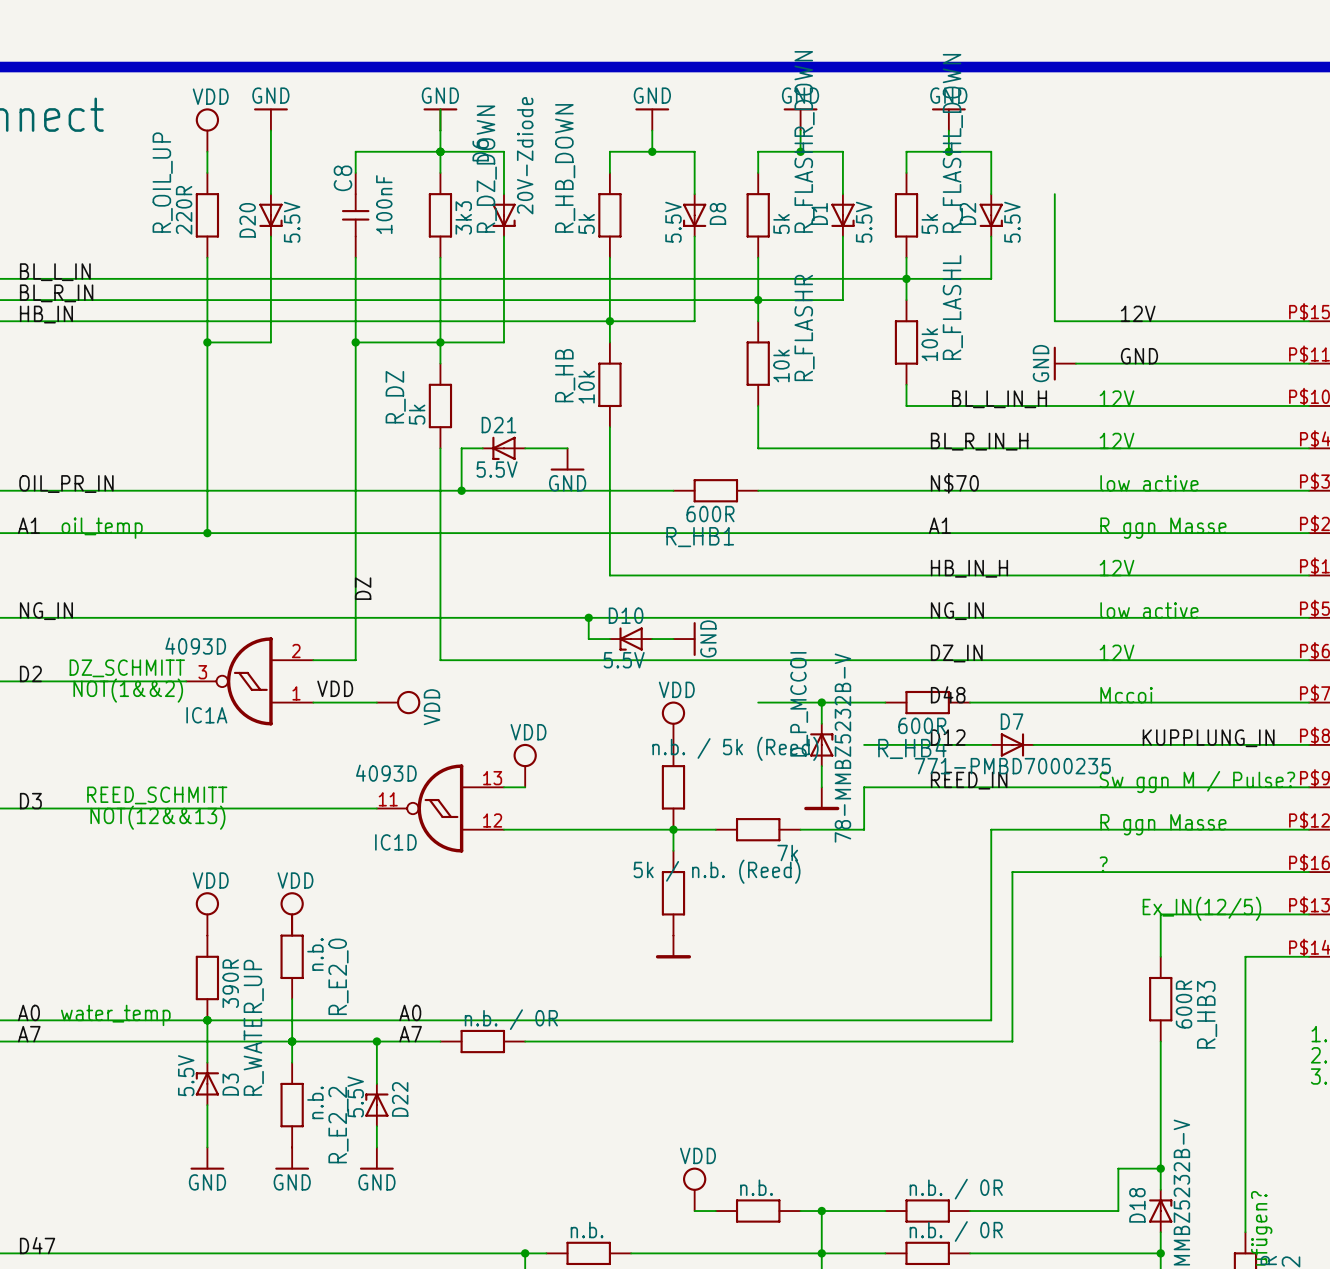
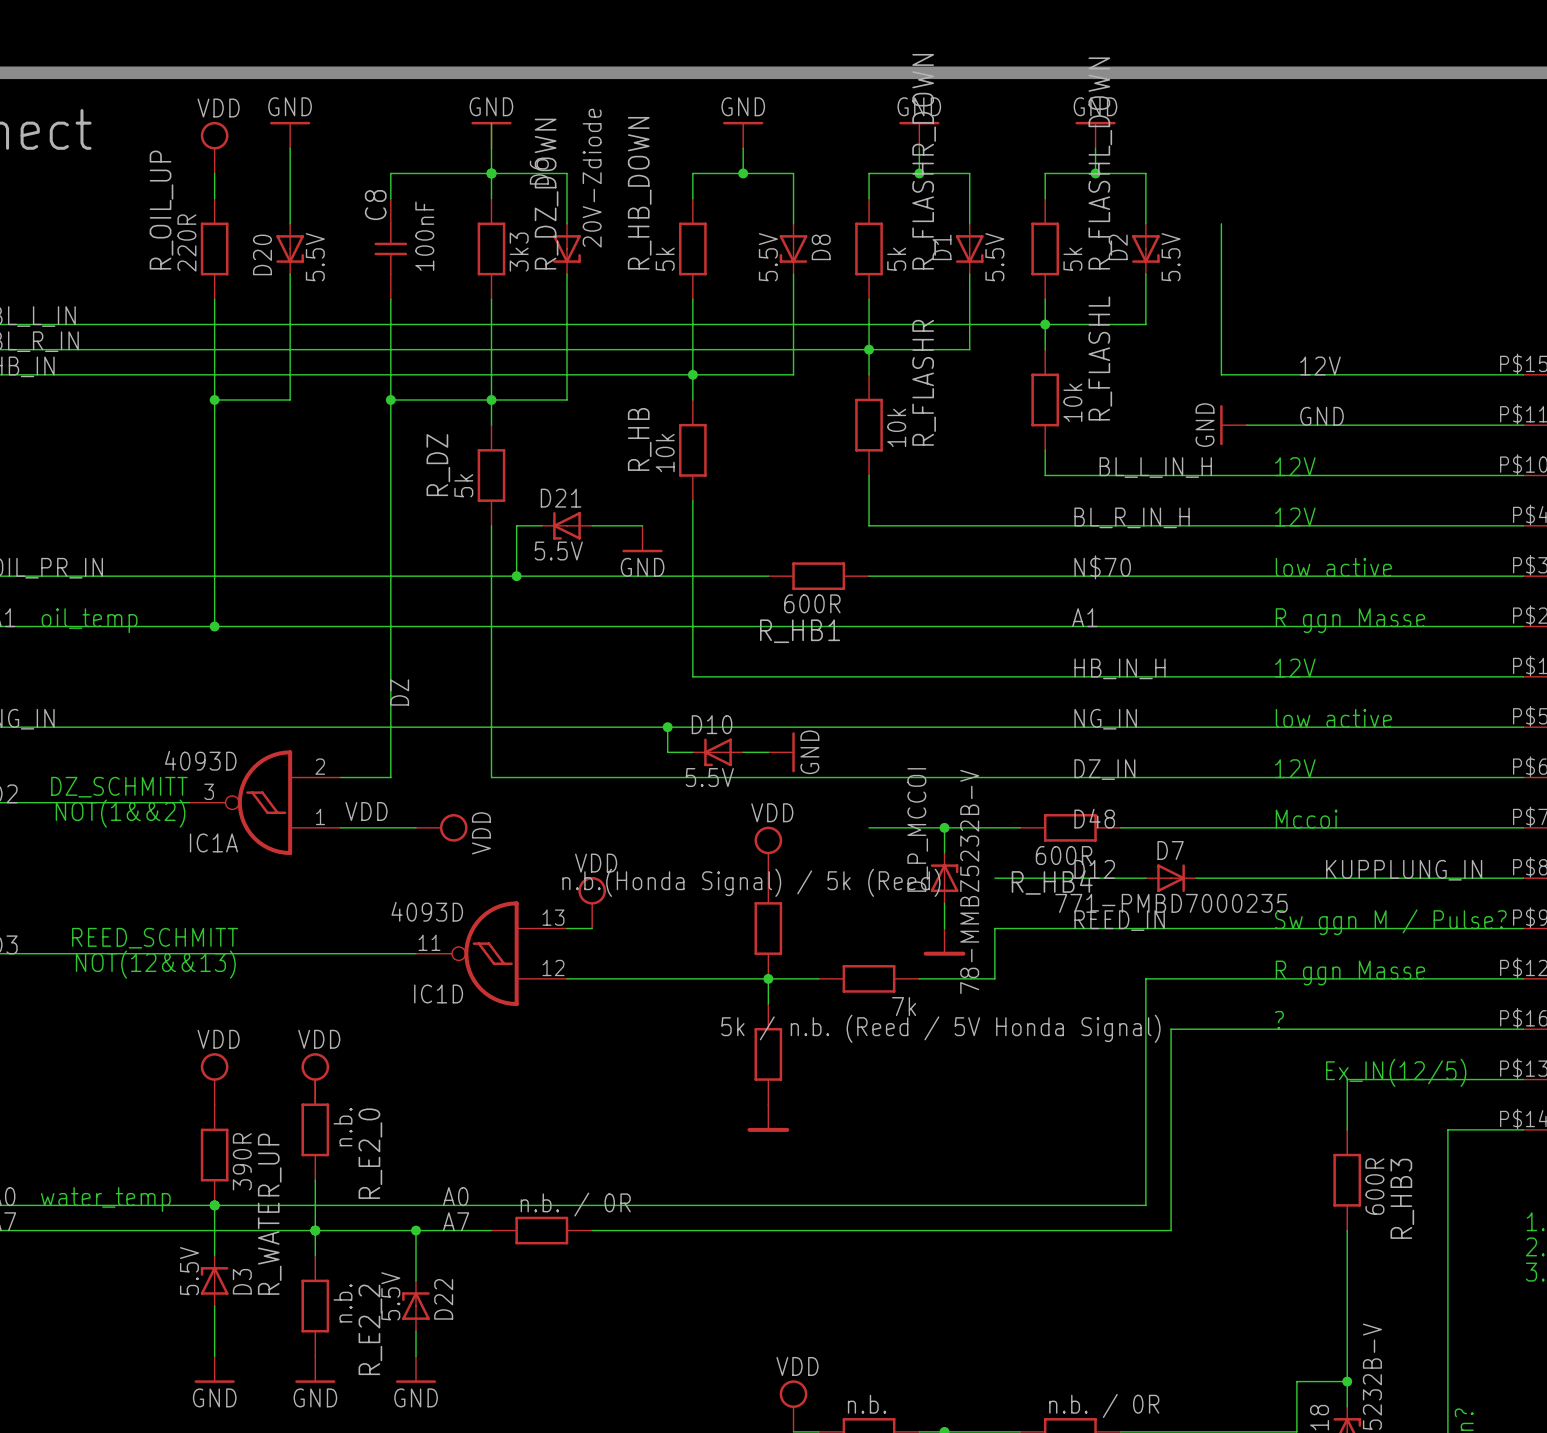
part value: n.b. / 5k (Reed) (735, 748) -> n.b.(Honda Signal) / 5k (Reed) (751, 882)
part value: 5k / n.b. (Reed) (717, 871) -> 5k / n.b. (Reed / 5V Honda Signal) (940, 1028)

